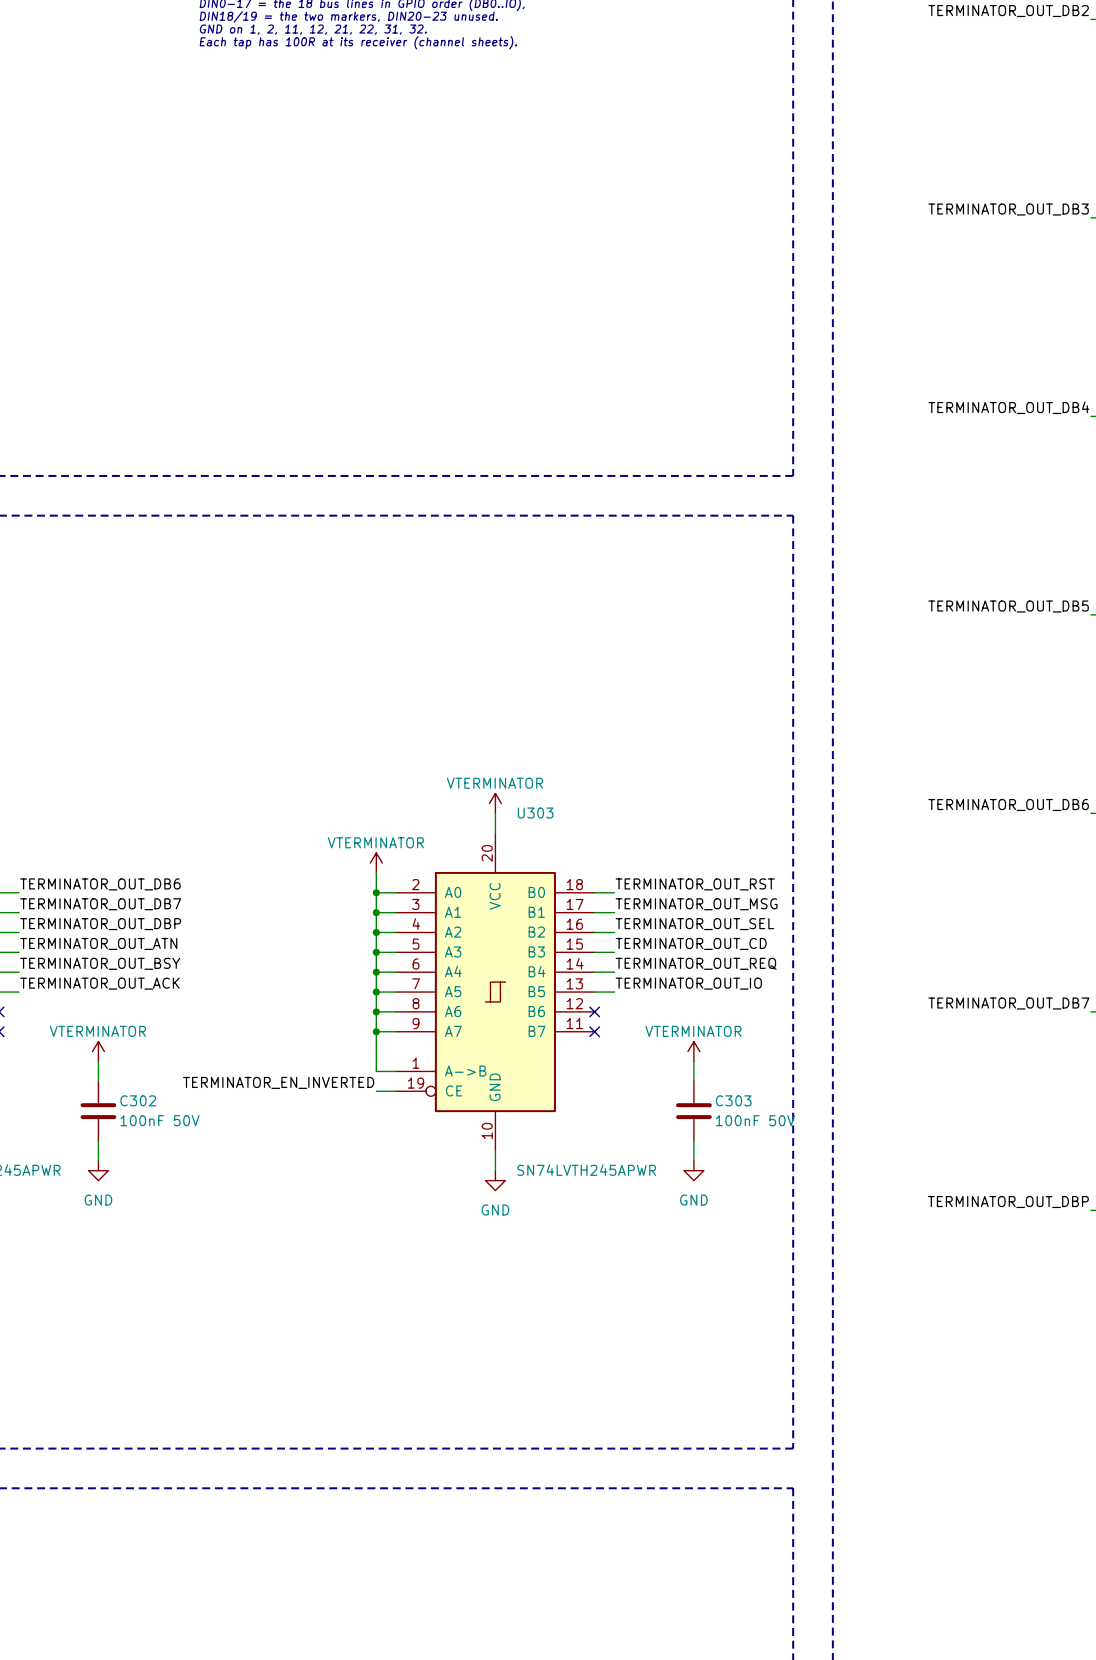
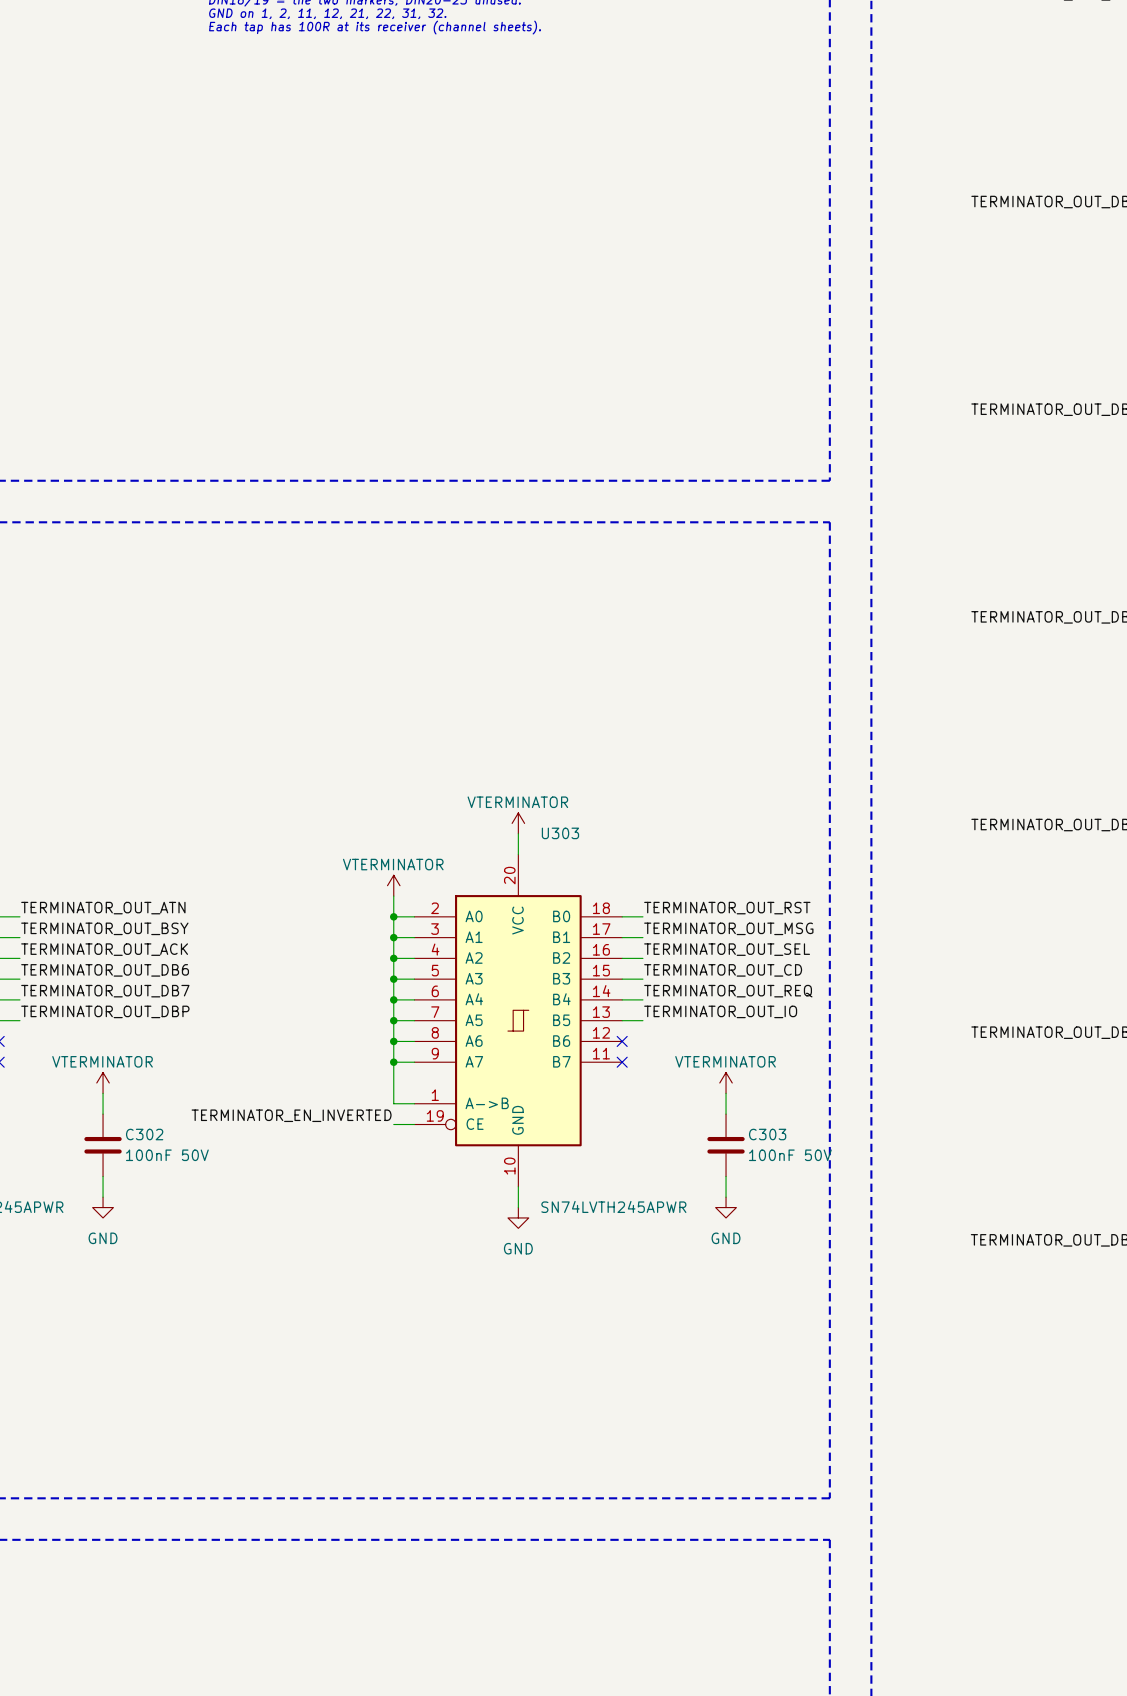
label: TERMINATOR_OUT_DB6 (100, 884) -> TERMINATOR_OUT_ATN (103, 908)
label: TERMINATOR_OUT_DB7 (100, 904) -> TERMINATOR_OUT_BSY (104, 928)
label: TERMINATOR_OUT_DBP (100, 924) -> TERMINATOR_OUT_ACK (104, 949)
label: TERMINATOR_OUT_ATN (98, 943) -> TERMINATOR_OUT_DB6 (105, 970)
label: TERMINATOR_OUT_BSY (100, 963) -> TERMINATOR_OUT_DB7 (105, 991)
label: TERMINATOR_OUT_ACK (99, 983) -> TERMINATOR_OUT_DBP (105, 1011)

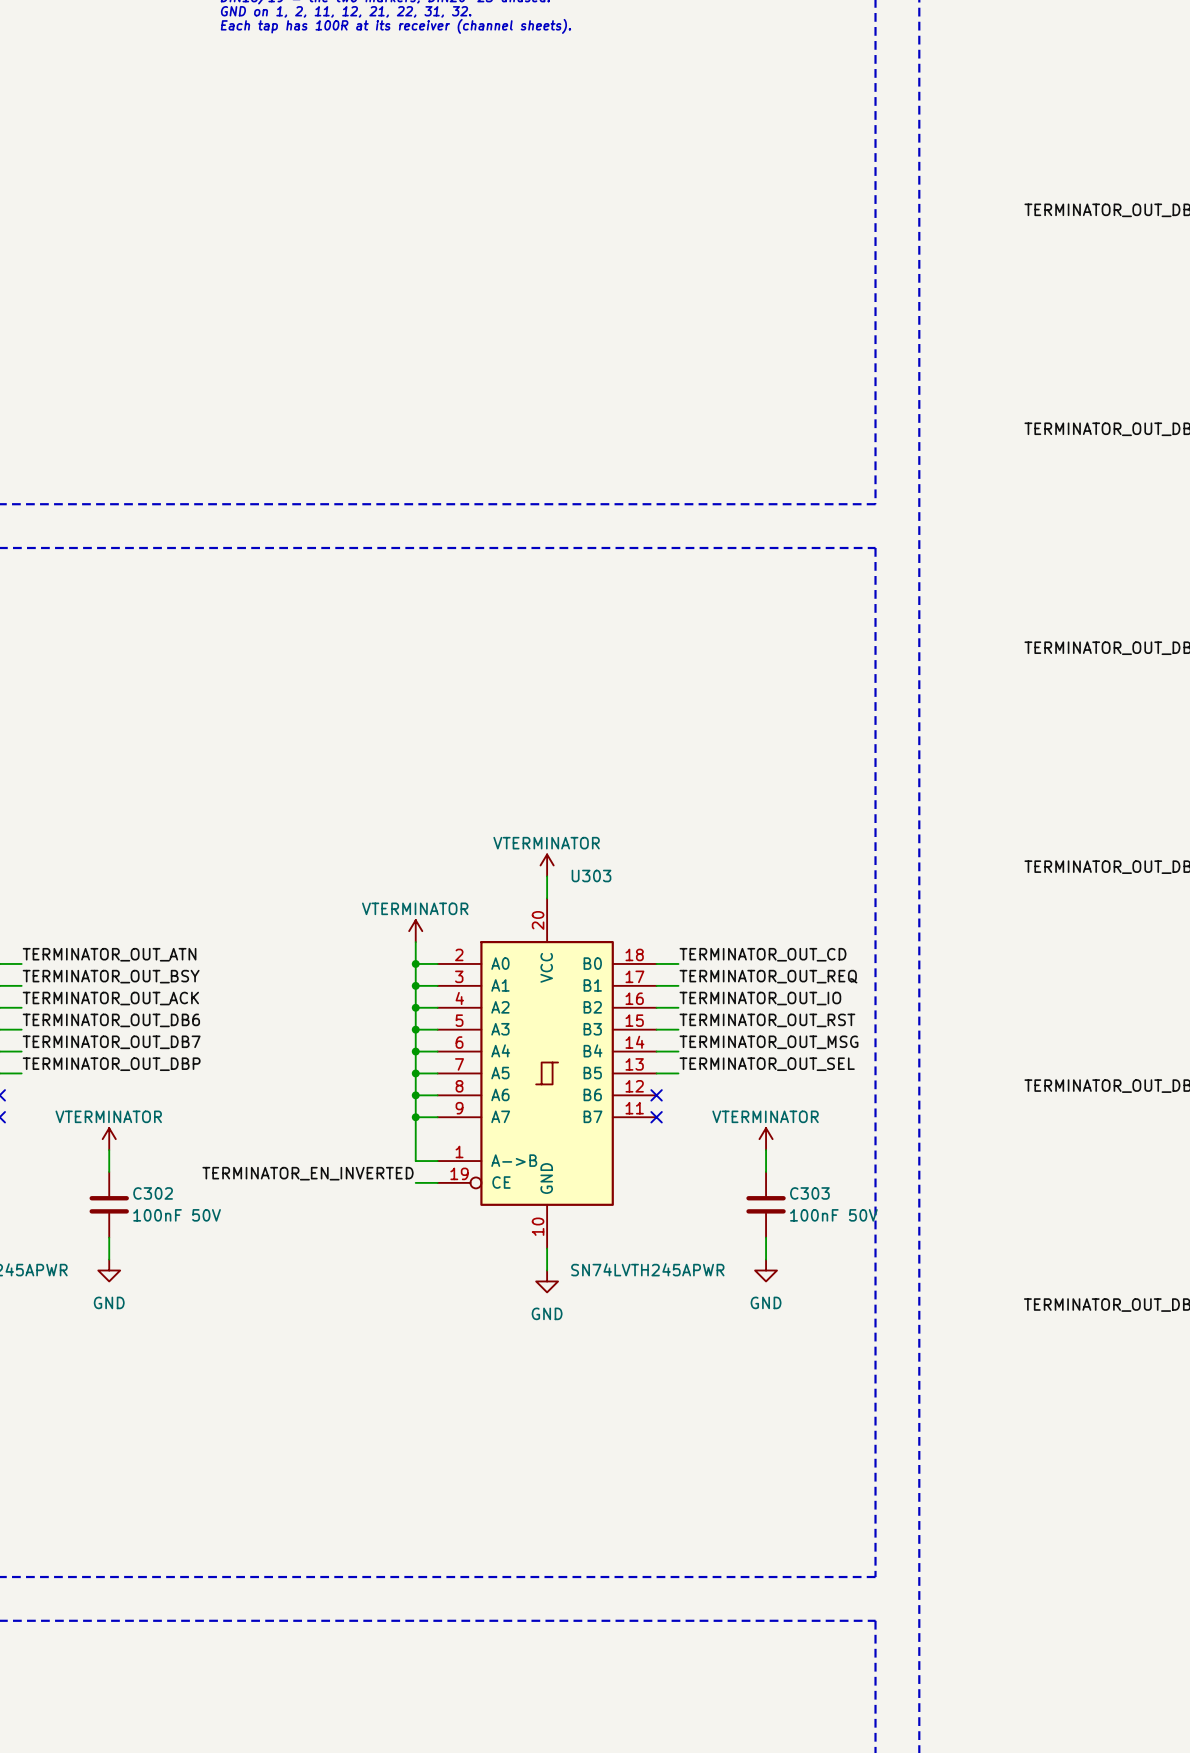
label: TERMINATOR_OUT_RST (727, 908) -> TERMINATOR_OUT_CD (763, 954)
label: TERMINATOR_OUT_MSG (728, 928) -> TERMINATOR_OUT_REQ (768, 976)
label: TERMINATOR_OUT_SEL (727, 949) -> TERMINATOR_OUT_IO (760, 998)
label: TERMINATOR_OUT_CD (723, 970) -> TERMINATOR_OUT_RST (767, 1020)
label: TERMINATOR_OUT_REQ (728, 991) -> TERMINATOR_OUT_MSG (768, 1042)
label: TERMINATOR_OUT_IO (720, 1011) -> TERMINATOR_OUT_SEL (767, 1064)

